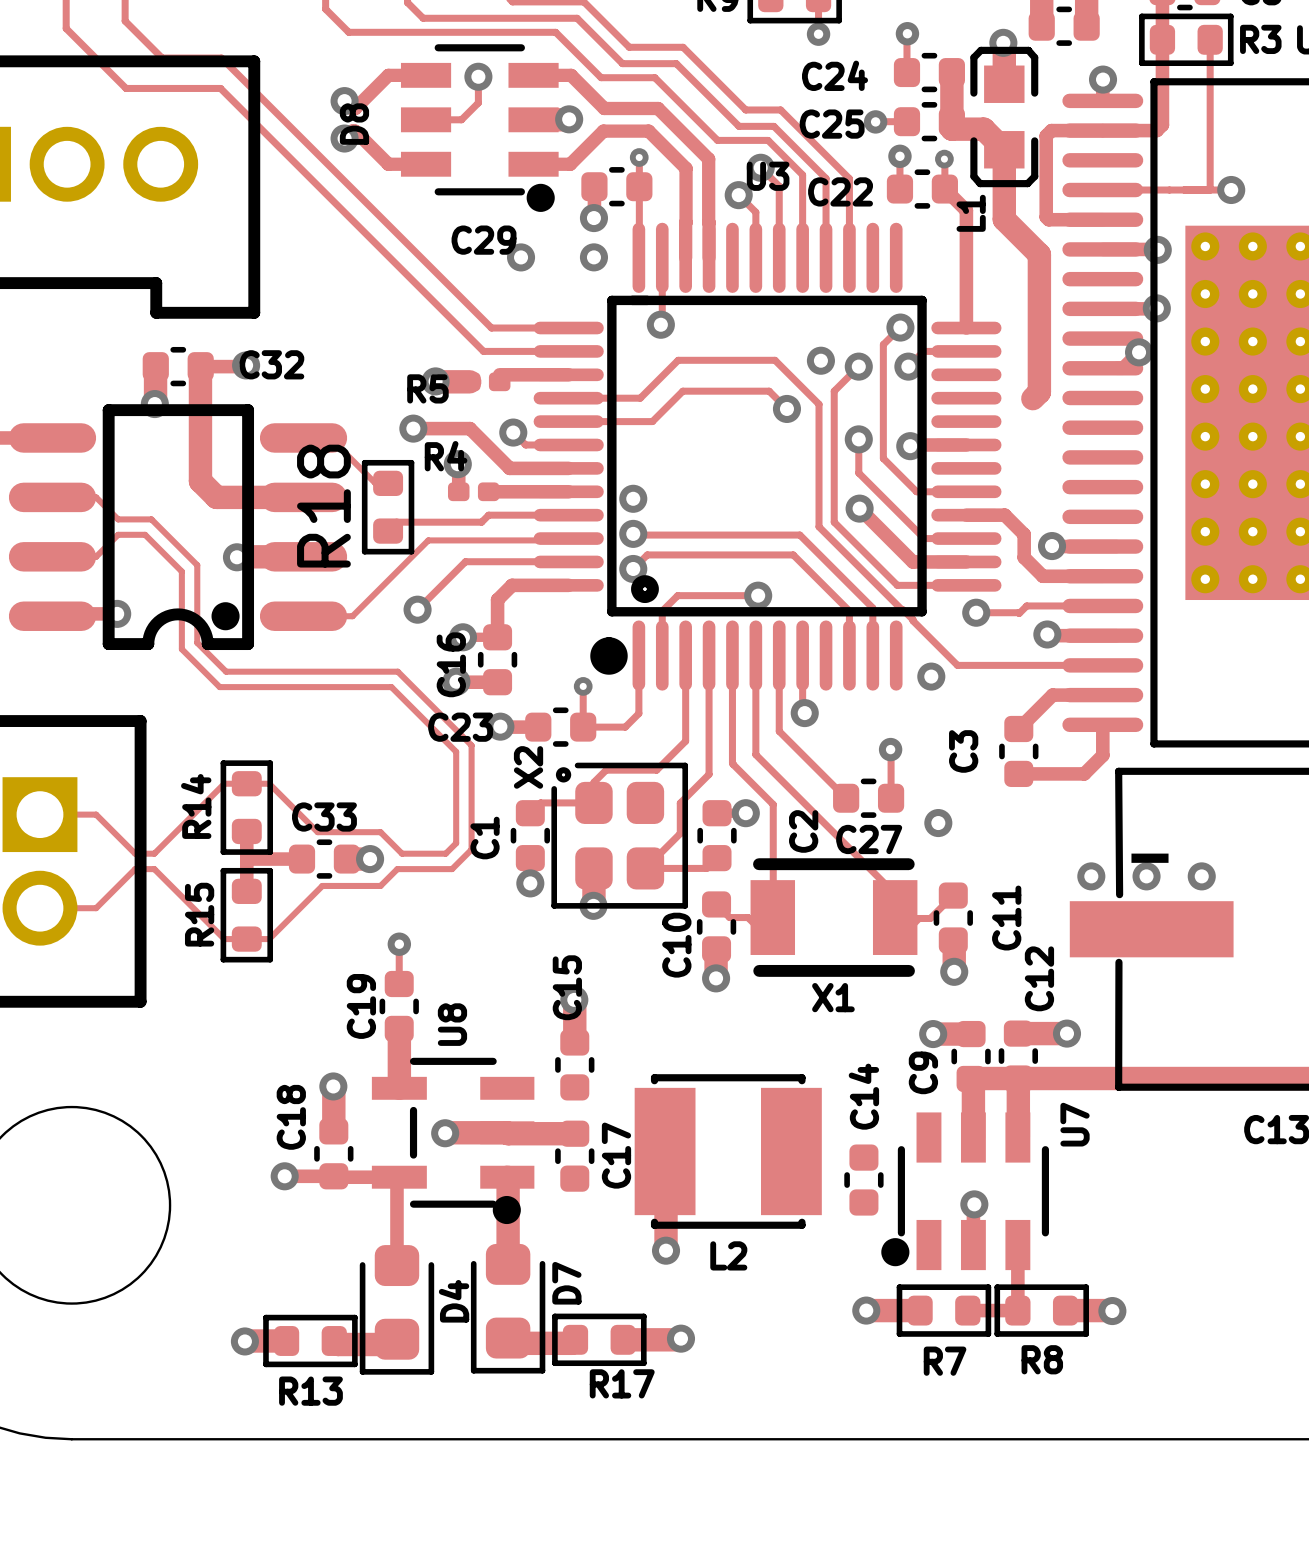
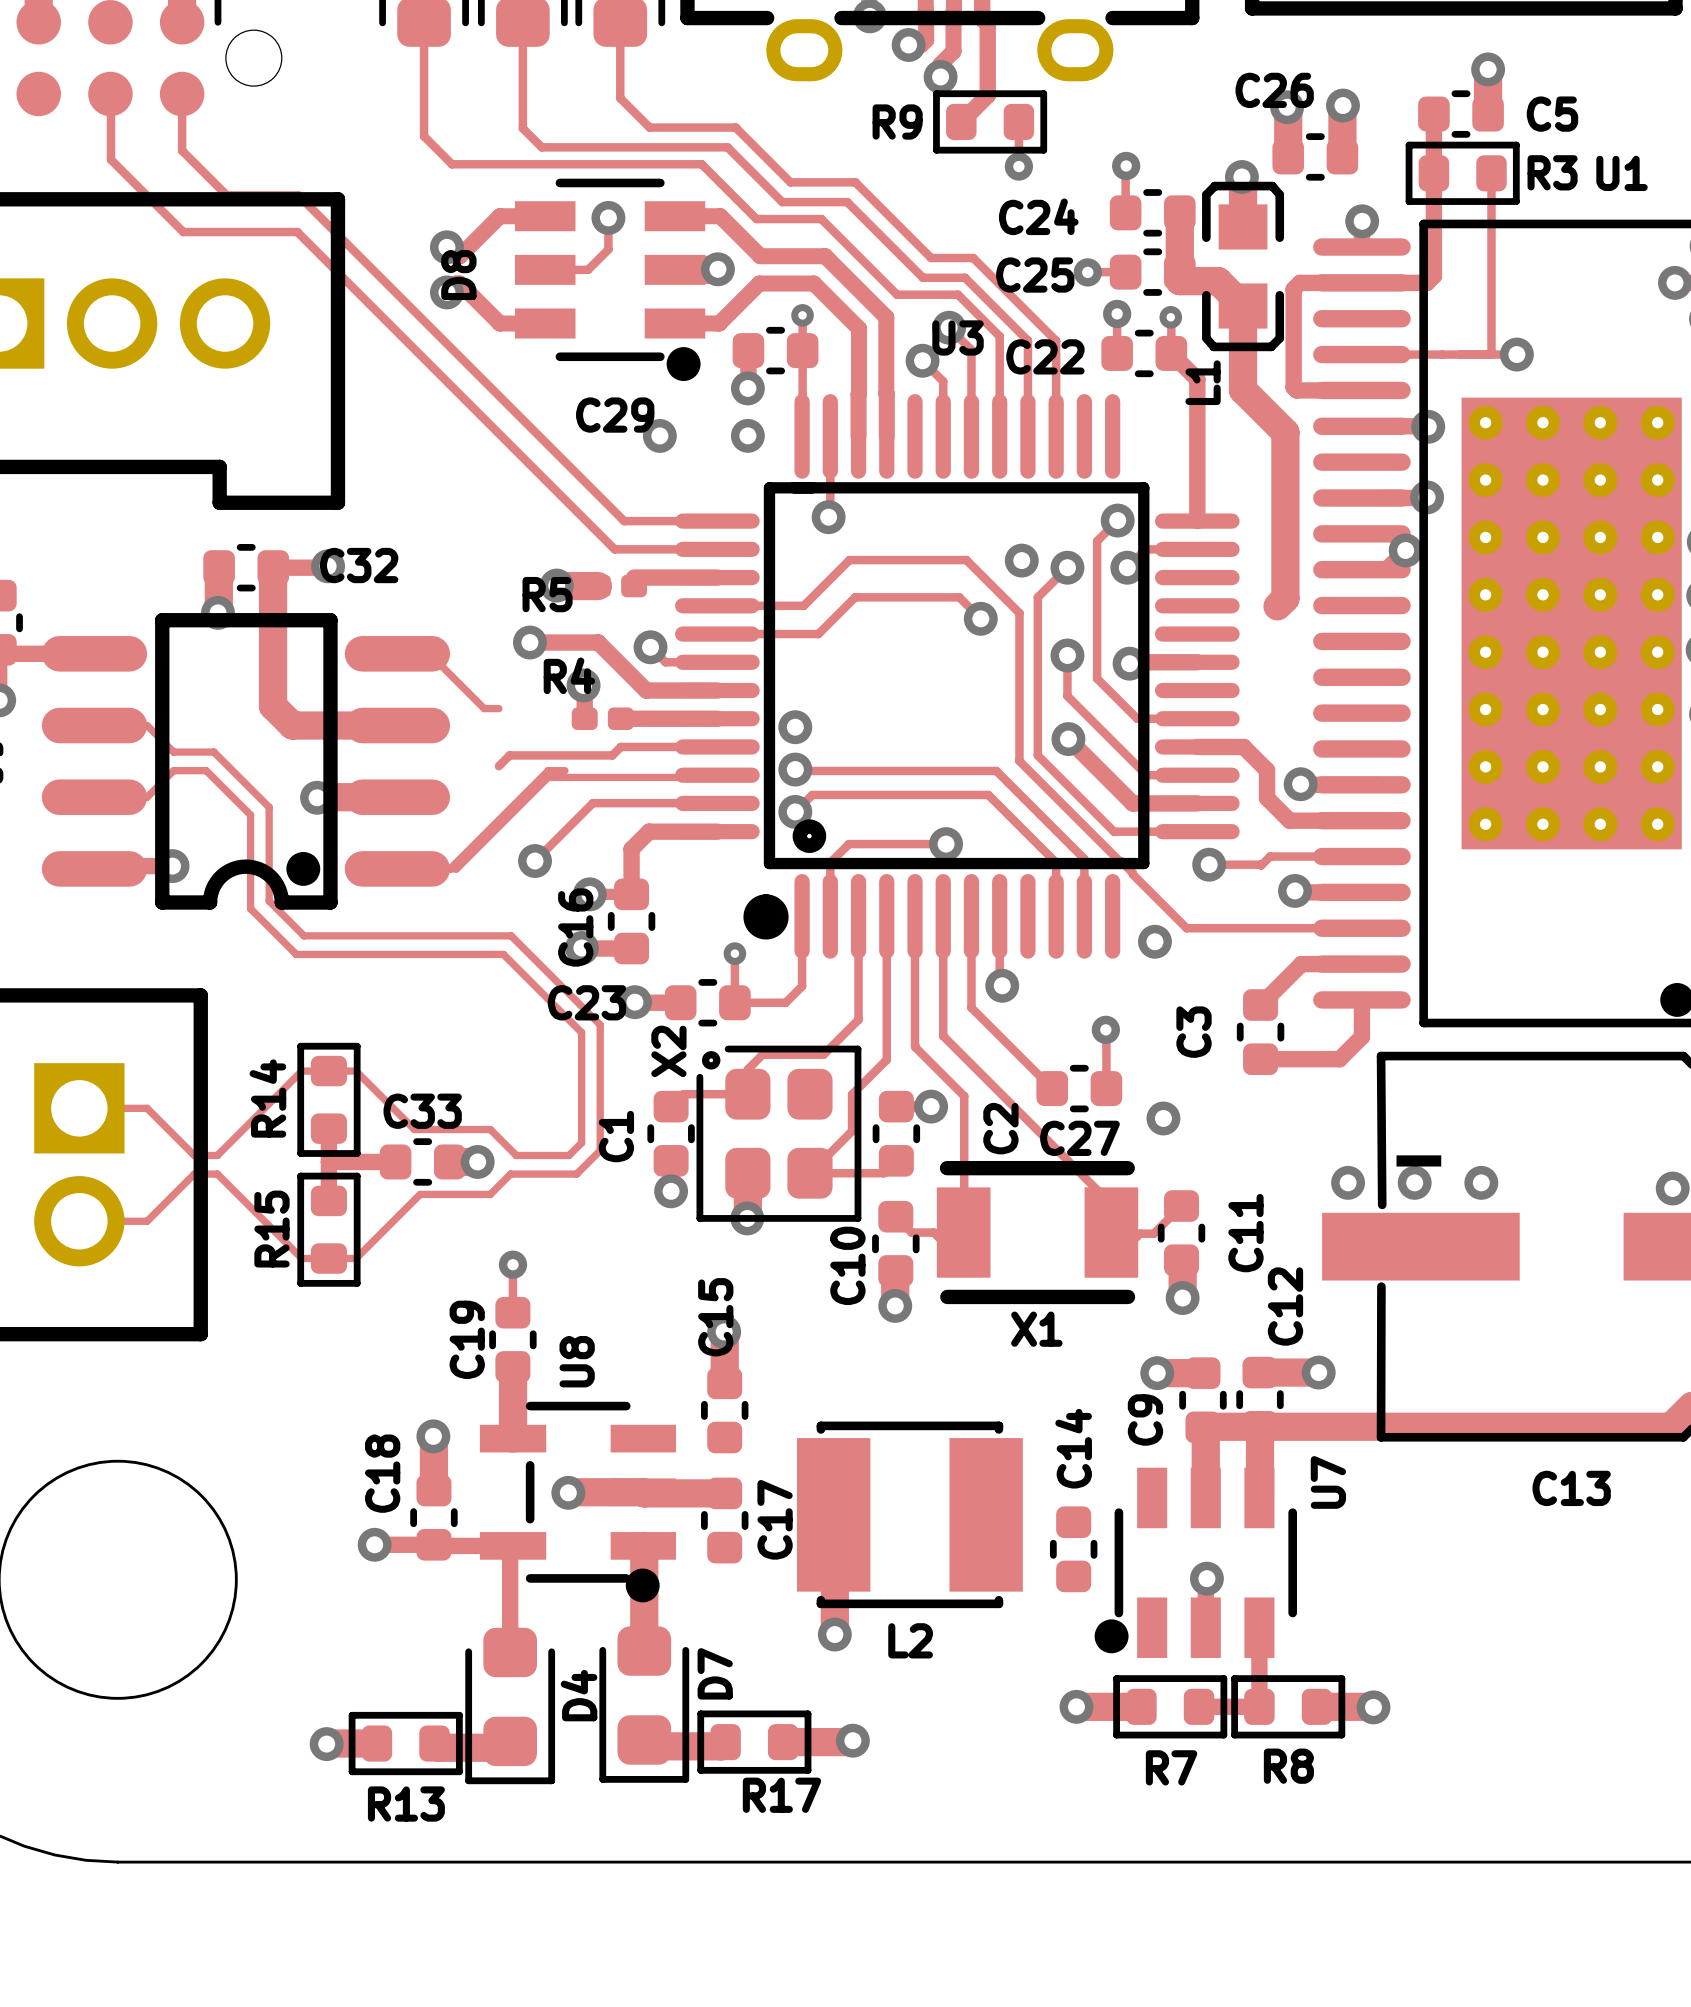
R18: (388, 507) -> none
track: none -> (564, 770) (548, 770) (450, 868)

